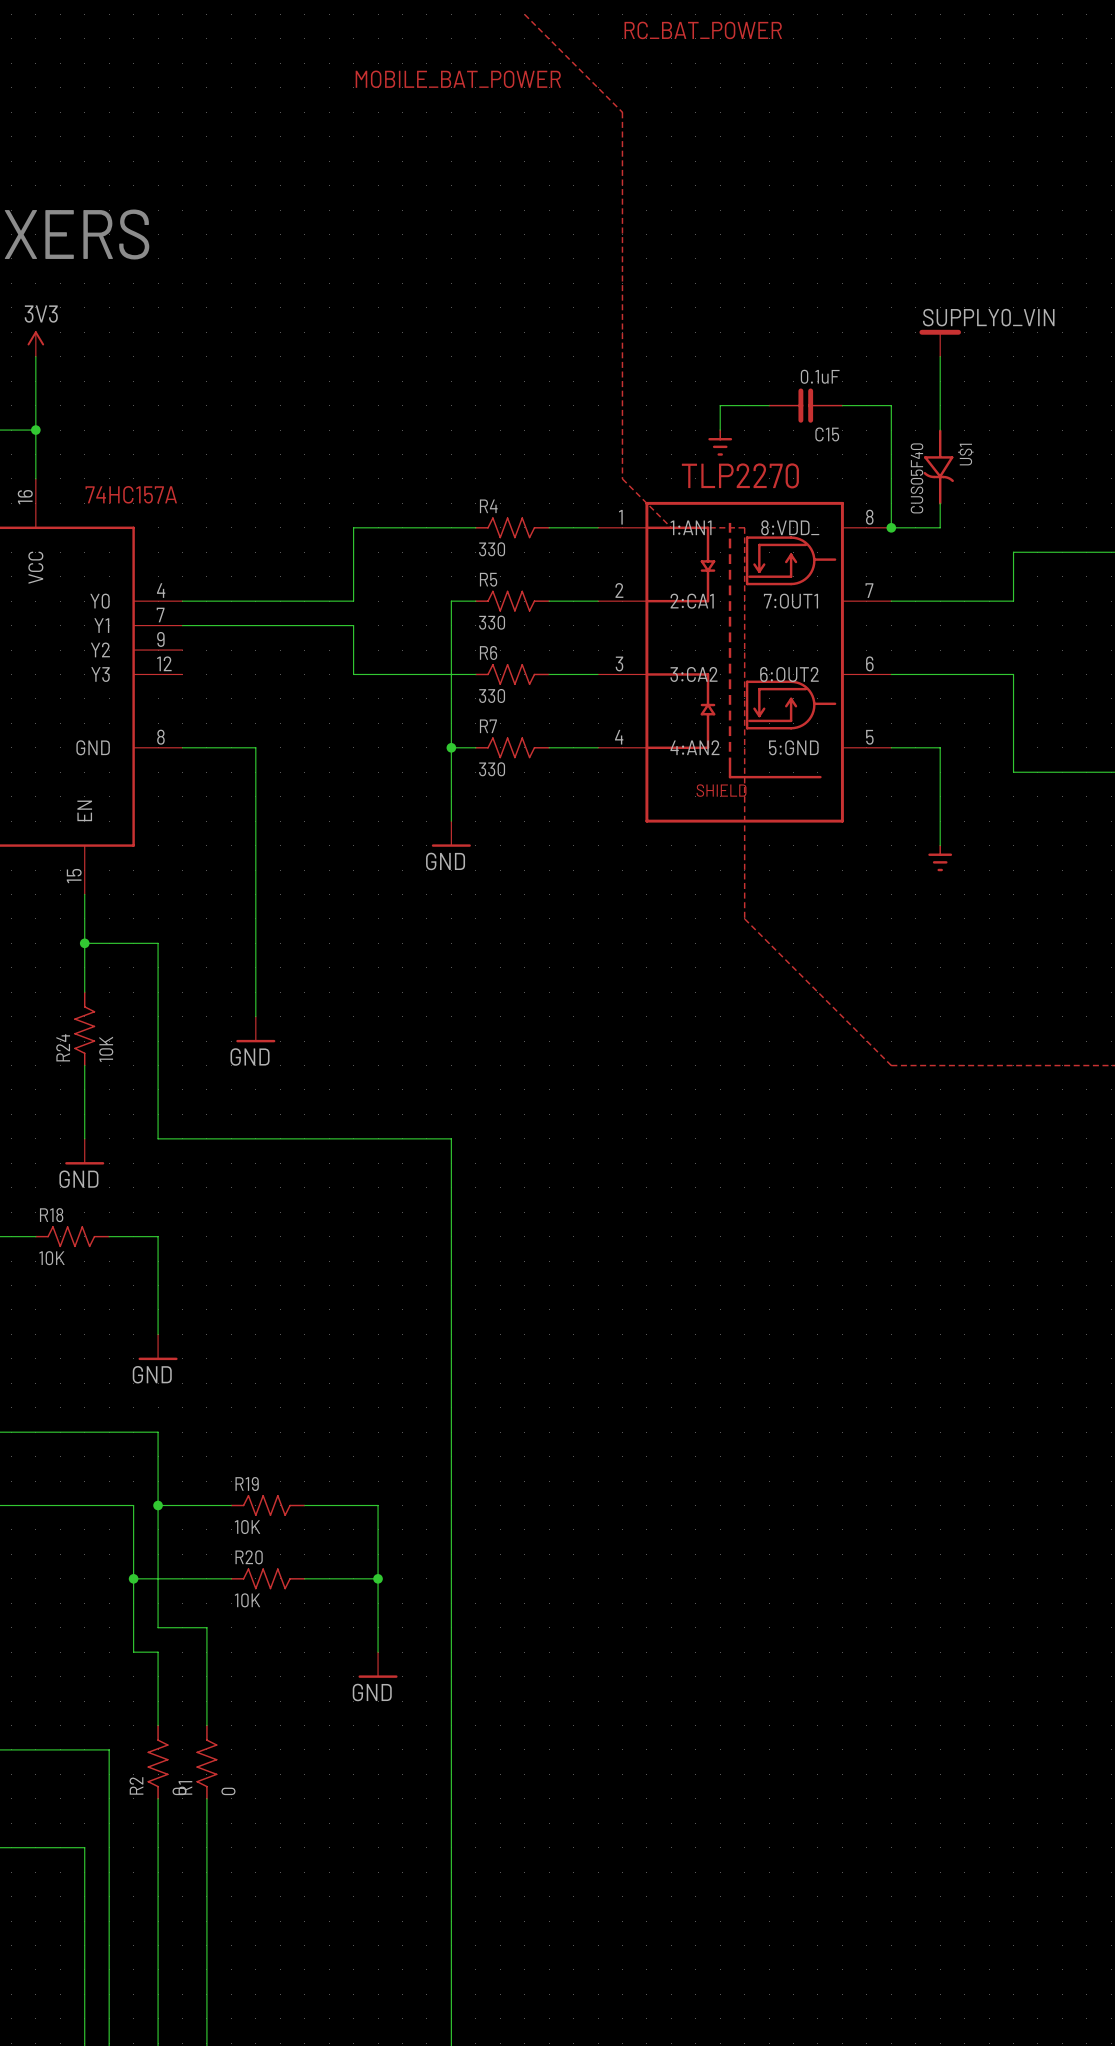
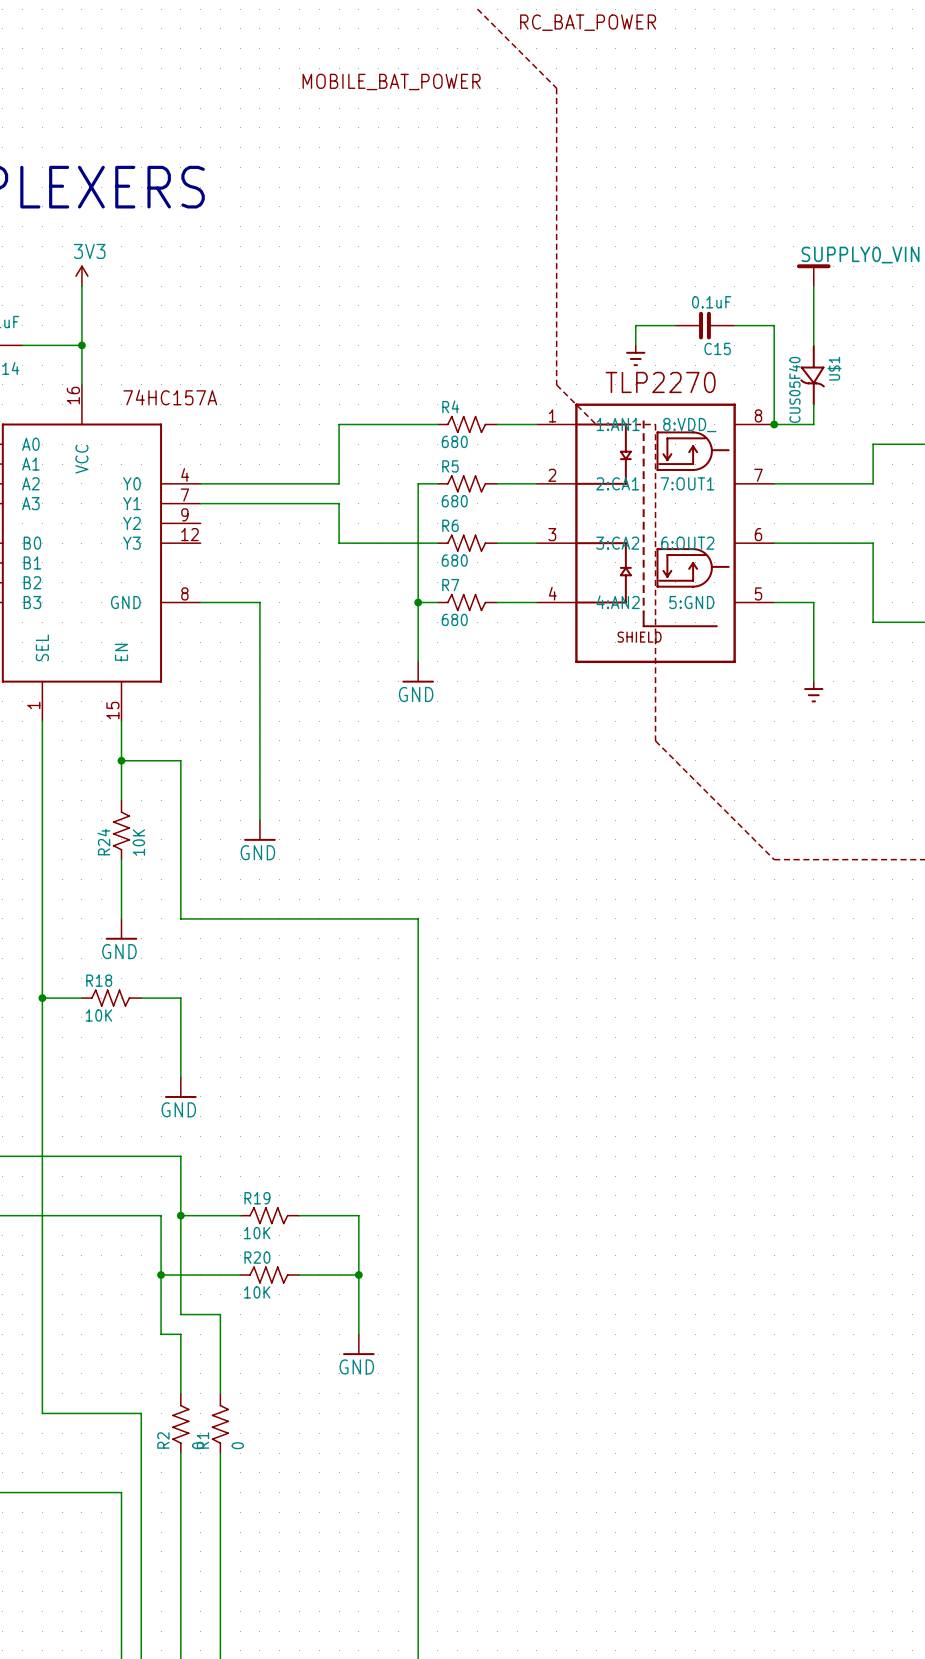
text position: RC_BAT_POWER (703, 30) -> RC_BAT_POWER (588, 22)
text position: MOBILE_BAT_POWER (458, 79) -> MOBILE_BAT_POWER (391, 81)
R4 value: 330 (492, 549) -> 680 (454, 441)
R5 value: 330 (492, 622) -> 680 (454, 501)
R6 value: 330 (492, 695) -> 680 (454, 560)
R7 value: 330 (492, 769) -> 680 (454, 619)

